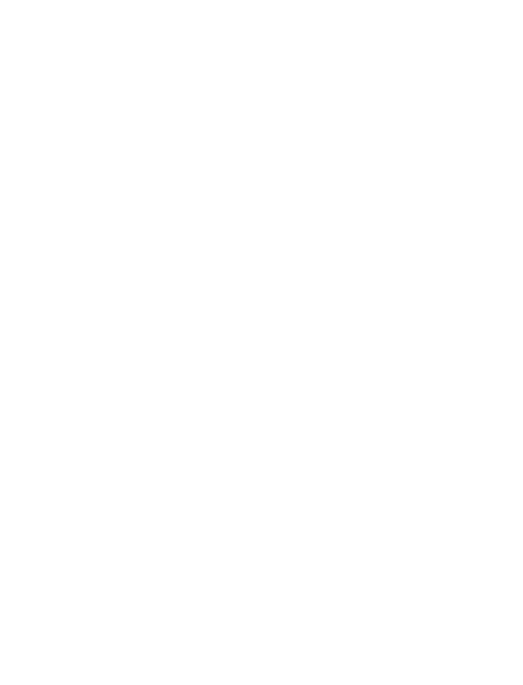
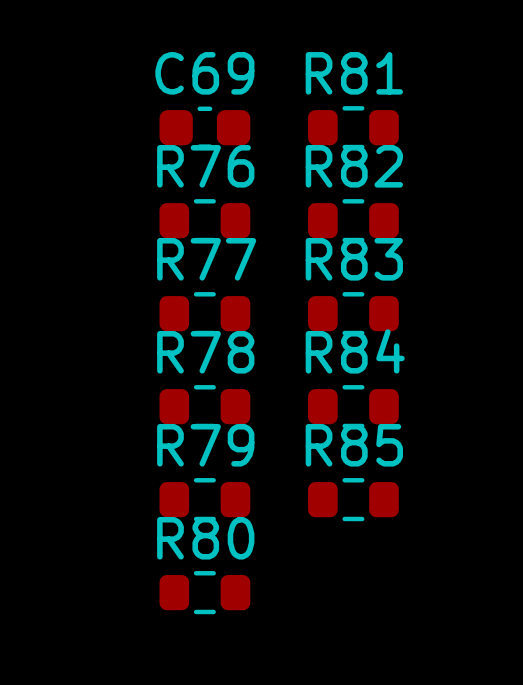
C69: none -> (204, 127)
R81: none -> (353, 127)
R76: none -> (204, 220)
R82: none -> (353, 220)
R77: none -> (204, 313)
R83: none -> (353, 313)
R78: none -> (204, 406)
R84: none -> (353, 406)
R79: none -> (204, 499)
R85: none -> (353, 499)
R80: none -> (204, 592)

